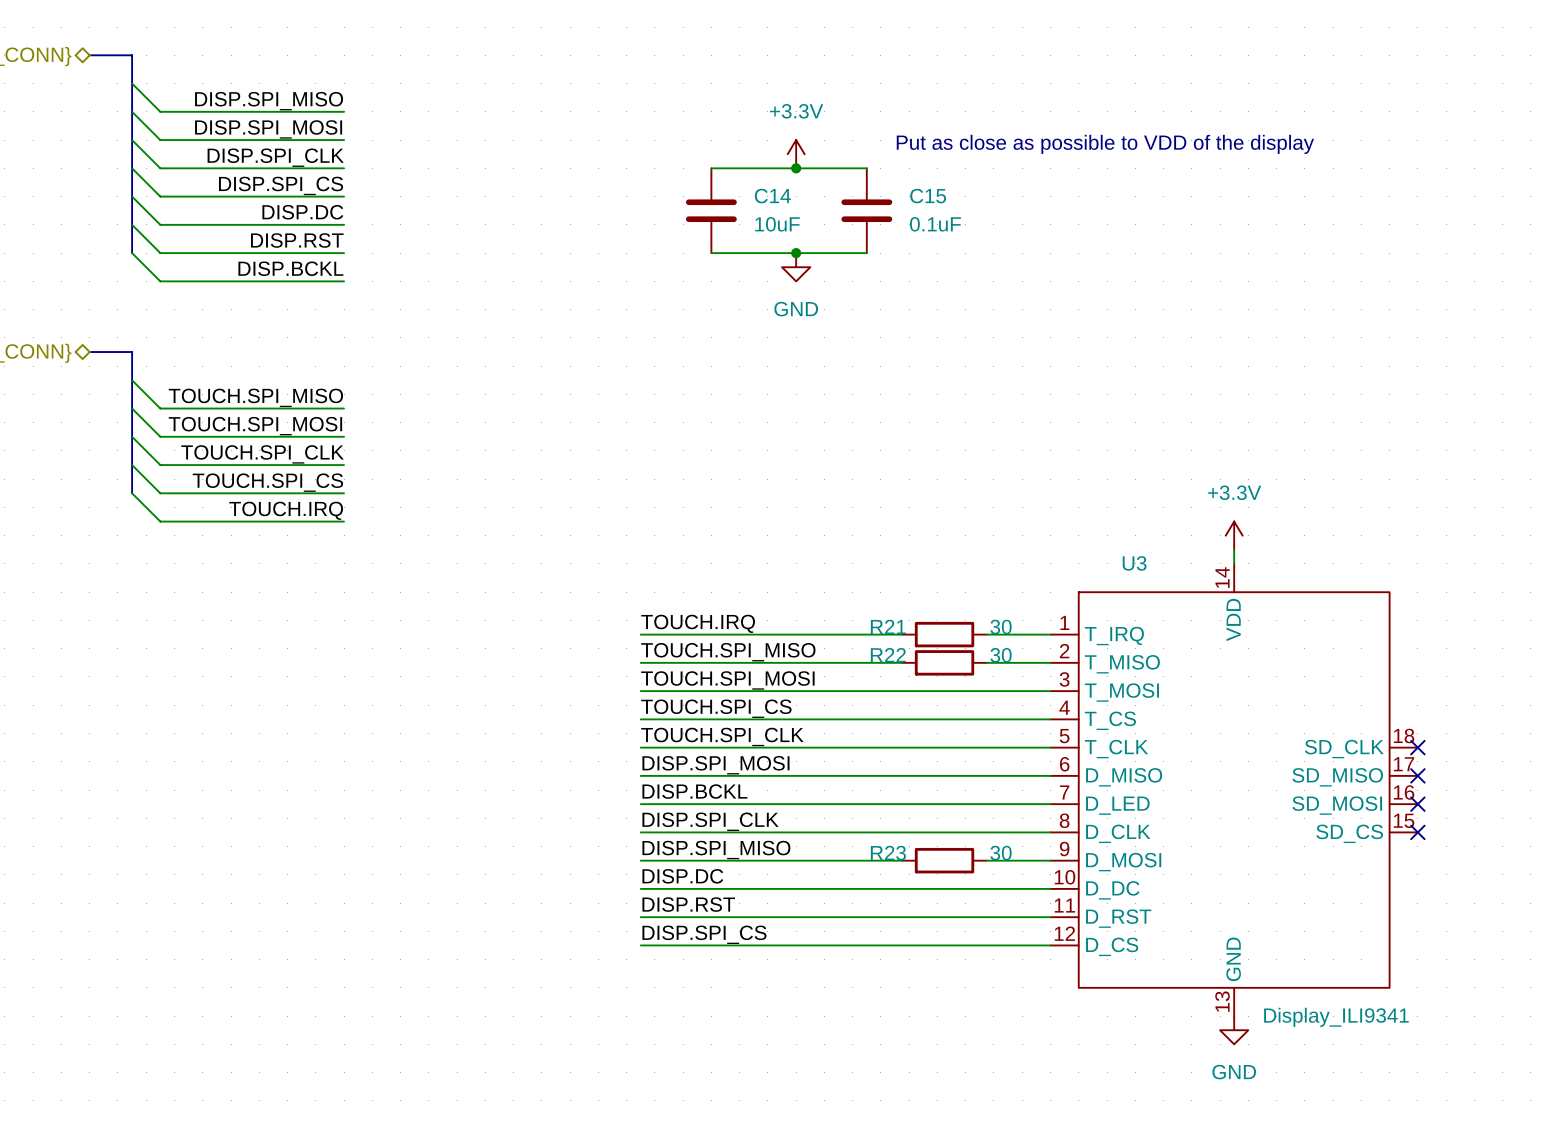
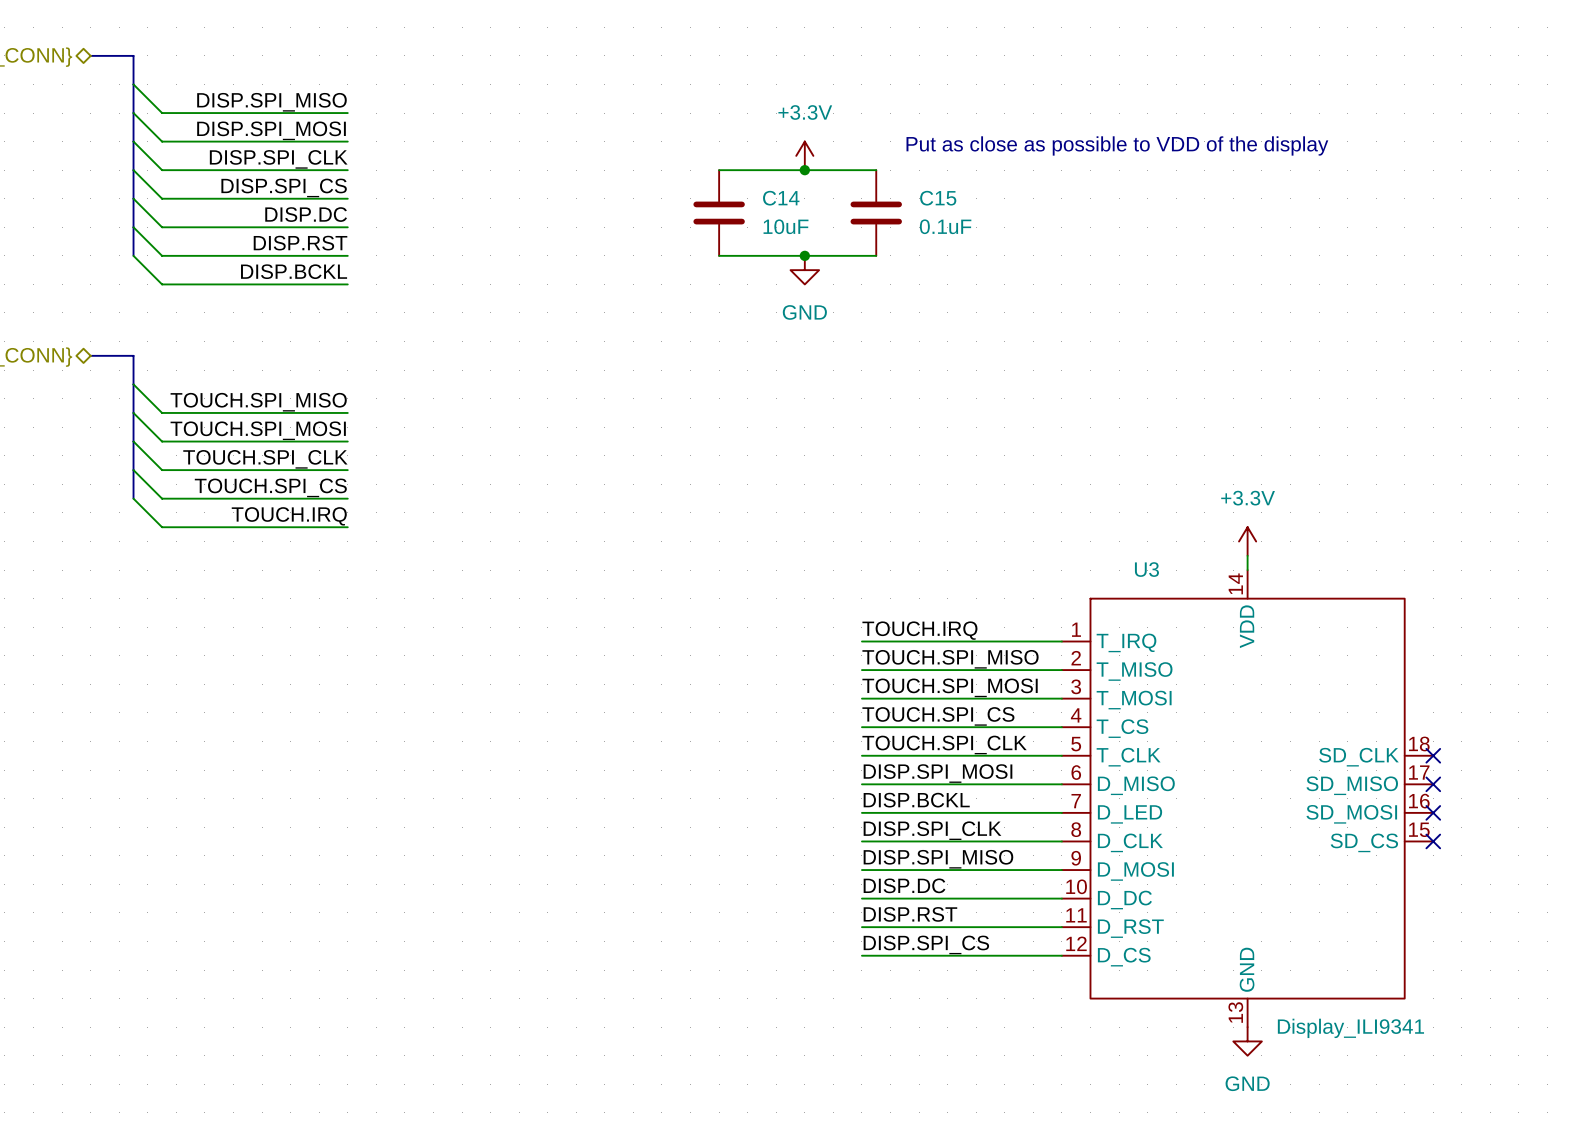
label position: TOUCH.IRQ (698, 623) -> TOUCH.IRQ (919, 630)
wire: (640, 634) (852, 634) -> none
wire: none -> (911, 641) (997, 641)
R21: 30 (944, 634) -> none
label position: TOUCH.SPI_MISO (728, 652) -> TOUCH.SPI_MISO (950, 659)
wire: (640, 662) (852, 662) -> none
wire: none -> (911, 670) (997, 670)
R22: 30 (944, 662) -> none
label position: TOUCH.SPI_MOSI (727, 680) -> TOUCH.SPI_MOSI (950, 687)
wire: (640, 691) (852, 691) -> none
label position: TOUCH.SPI_CS (716, 708) -> TOUCH.SPI_CS (938, 716)
wire: (640, 719) (852, 719) -> none
label position: TOUCH.SPI_CLK (722, 736) -> TOUCH.SPI_CLK (944, 744)
wire: (640, 747) (852, 747) -> none
label position: DISP.SPI_MOSI (715, 765) -> DISP.SPI_MOSI (938, 773)
wire: (640, 775) (852, 775) -> none
label position: DISP.BCKL (694, 791) -> DISP.BCKL (916, 800)
wire: (640, 804) (852, 804) -> none
label position: DISP.SPI_CLK (710, 821) -> DISP.SPI_CLK (932, 830)
wire: (640, 832) (852, 832) -> none
label position: DISP.SPI_MISO (716, 850) -> DISP.SPI_MISO (938, 859)
wire: (640, 860) (852, 860) -> none
wire: none -> (911, 870) (997, 870)
R23: 30 (944, 860) -> none
label position: DISP.DC (682, 876) -> DISP.DC (904, 885)
wire: (640, 888) (852, 888) -> none
label position: DISP.RST (688, 904) -> DISP.RST (910, 914)
wire: (640, 917) (852, 917) -> none
label position: DISP.SPI_CS (704, 934) -> DISP.SPI_CS (926, 944)
wire: (640, 945) (852, 945) -> none

